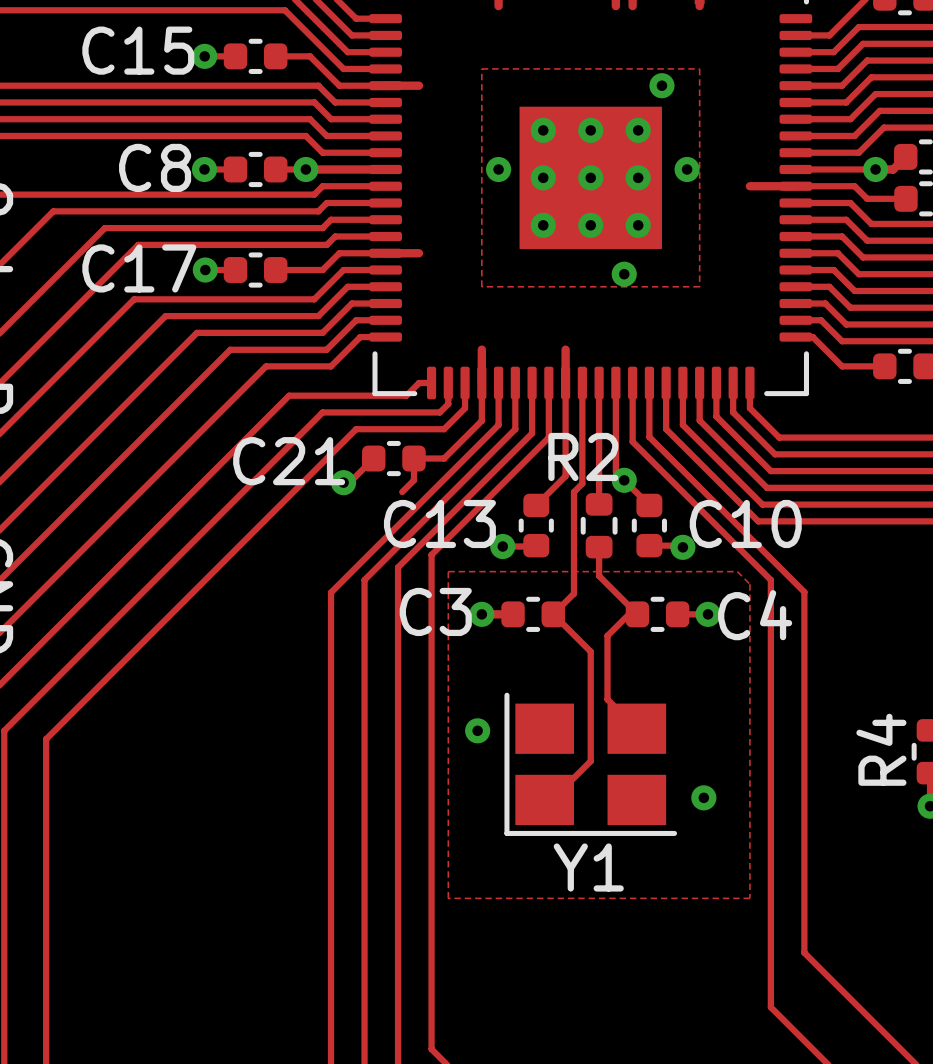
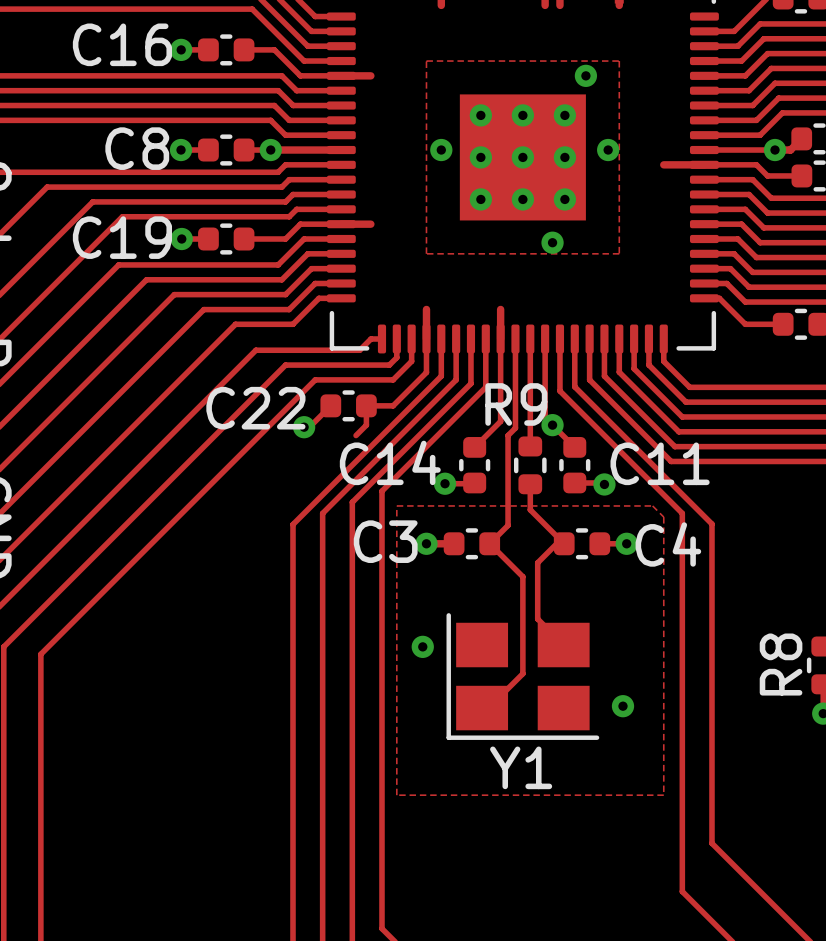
C15 name: C15 (138, 50) -> C16 (122, 44)
C17 name: C17 (139, 268) -> C19 (122, 237)
R2 name: R2 (583, 456) -> R9 (516, 404)
C21 name: C21 (289, 461) -> C22 (255, 408)
C13 name: C13 (439, 523) -> C14 (390, 462)
C10 name: C10 (745, 523) -> C11 (660, 463)
R4 name: R4 (881, 749) -> R8 (781, 664)

